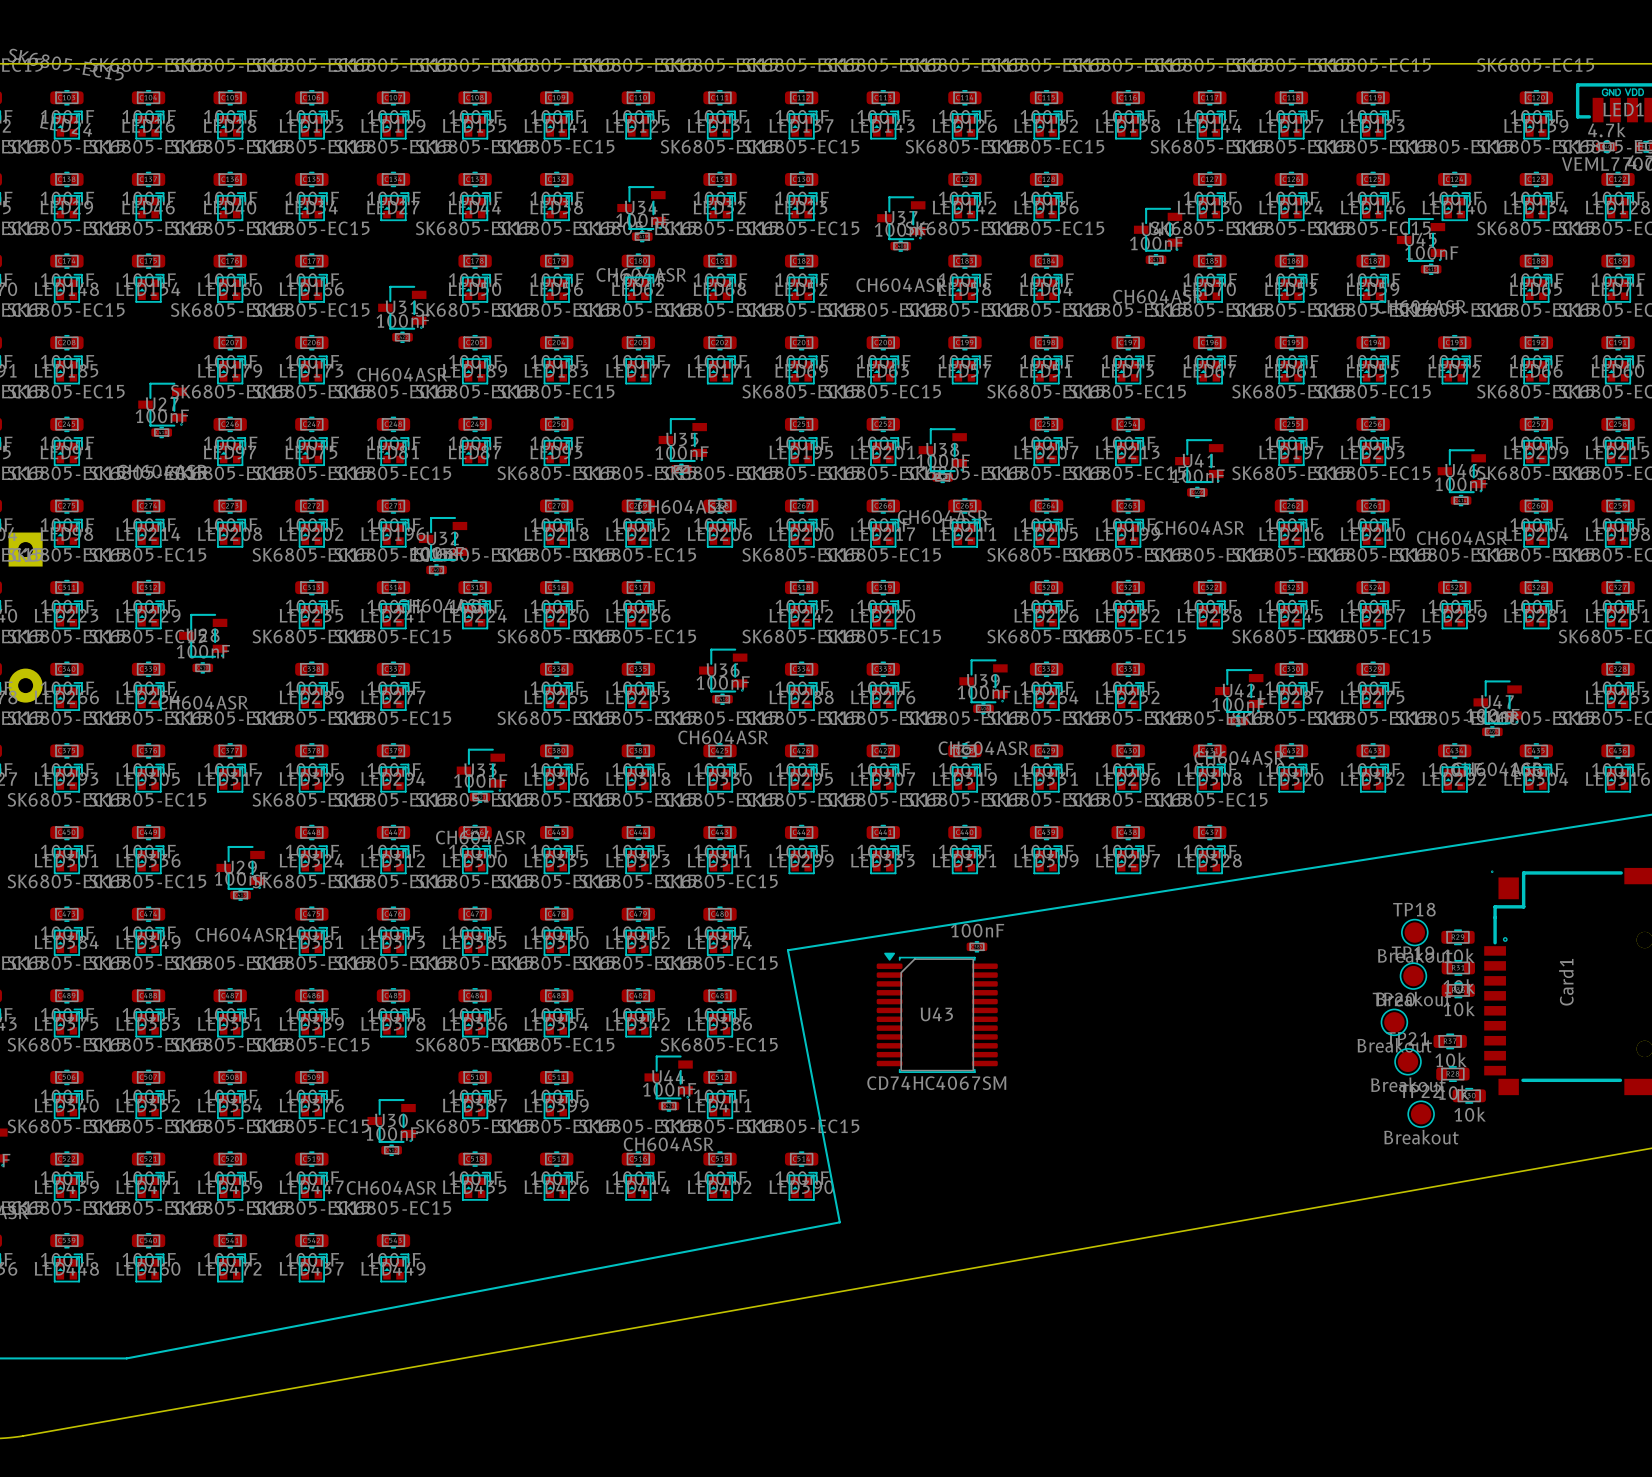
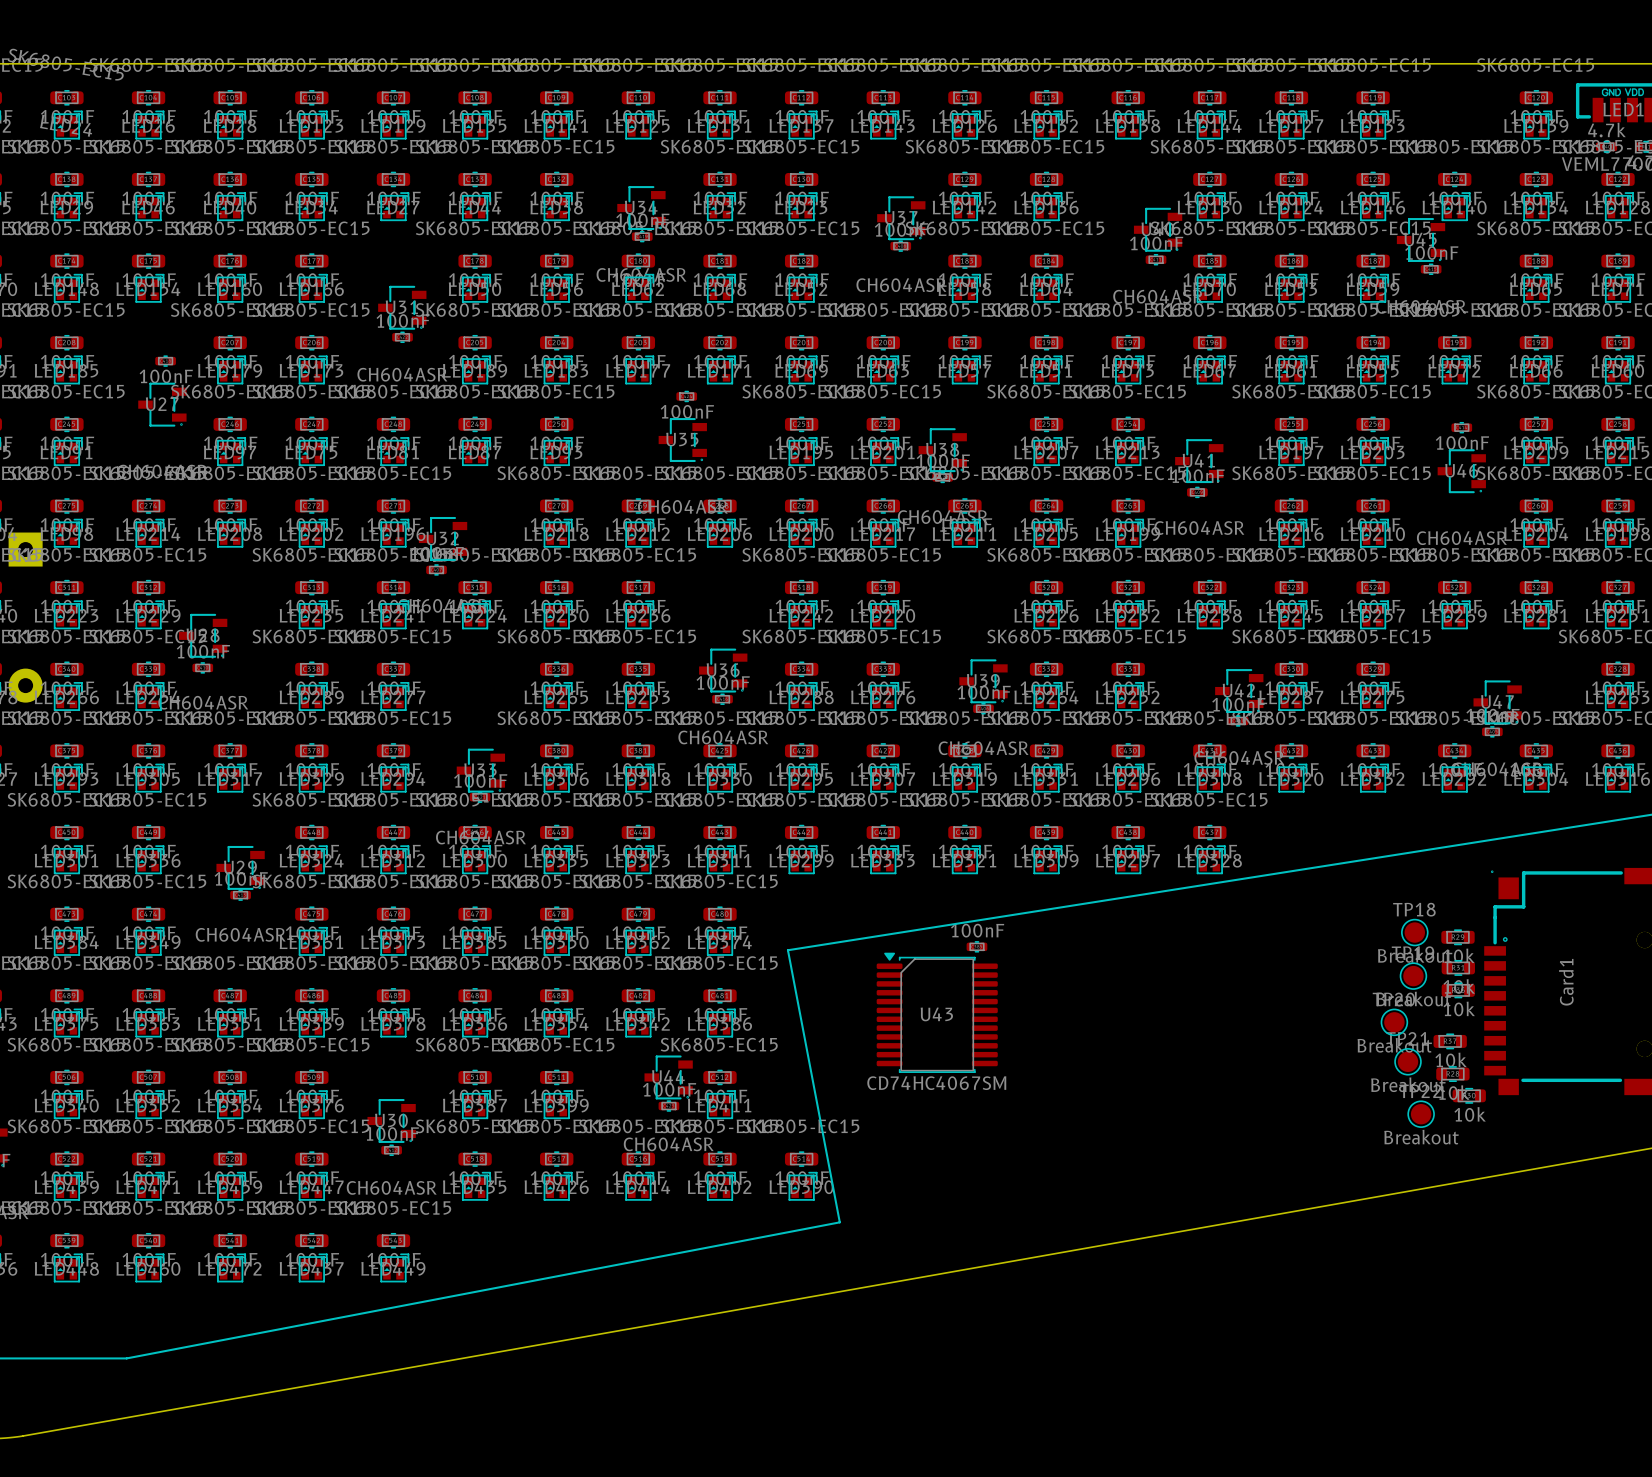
part value position: 100nF (162, 416) -> 100nF (166, 376)
part position: (161, 432) -> (165, 361)
part value position: 100nF (682, 453) -> 100nF (687, 411)
part position: (681, 469) -> (686, 396)
part value position: 100nF (1461, 484) -> 100nF (1462, 443)
part position: (1461, 500) -> (1461, 427)

